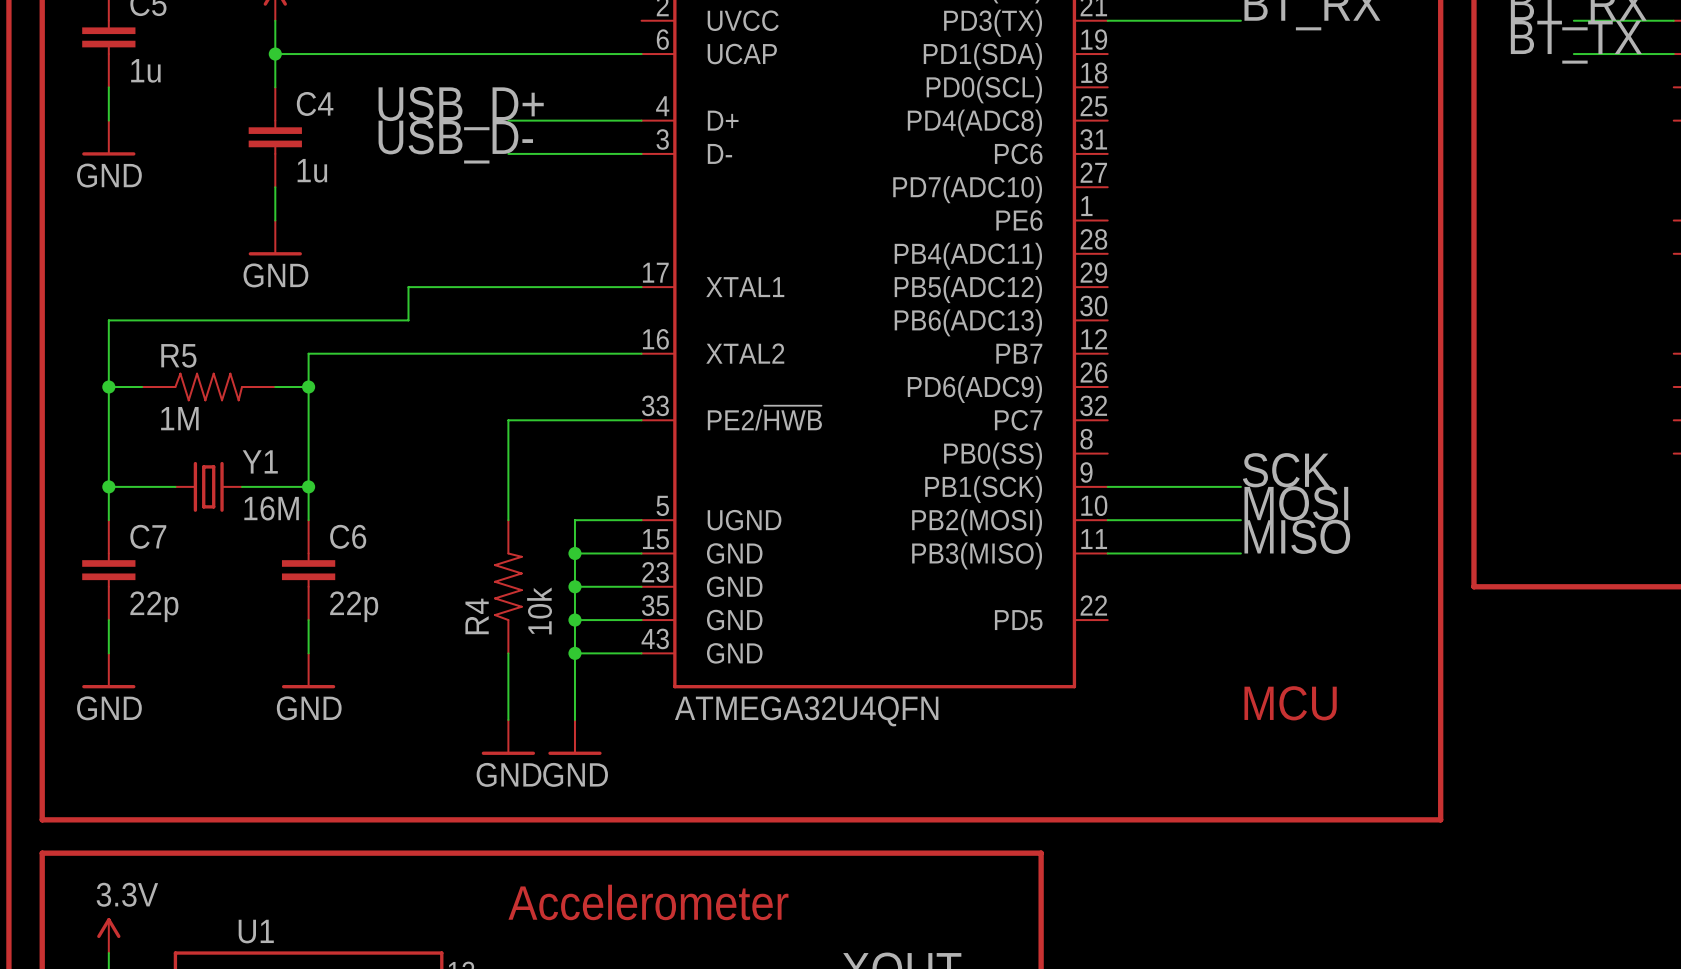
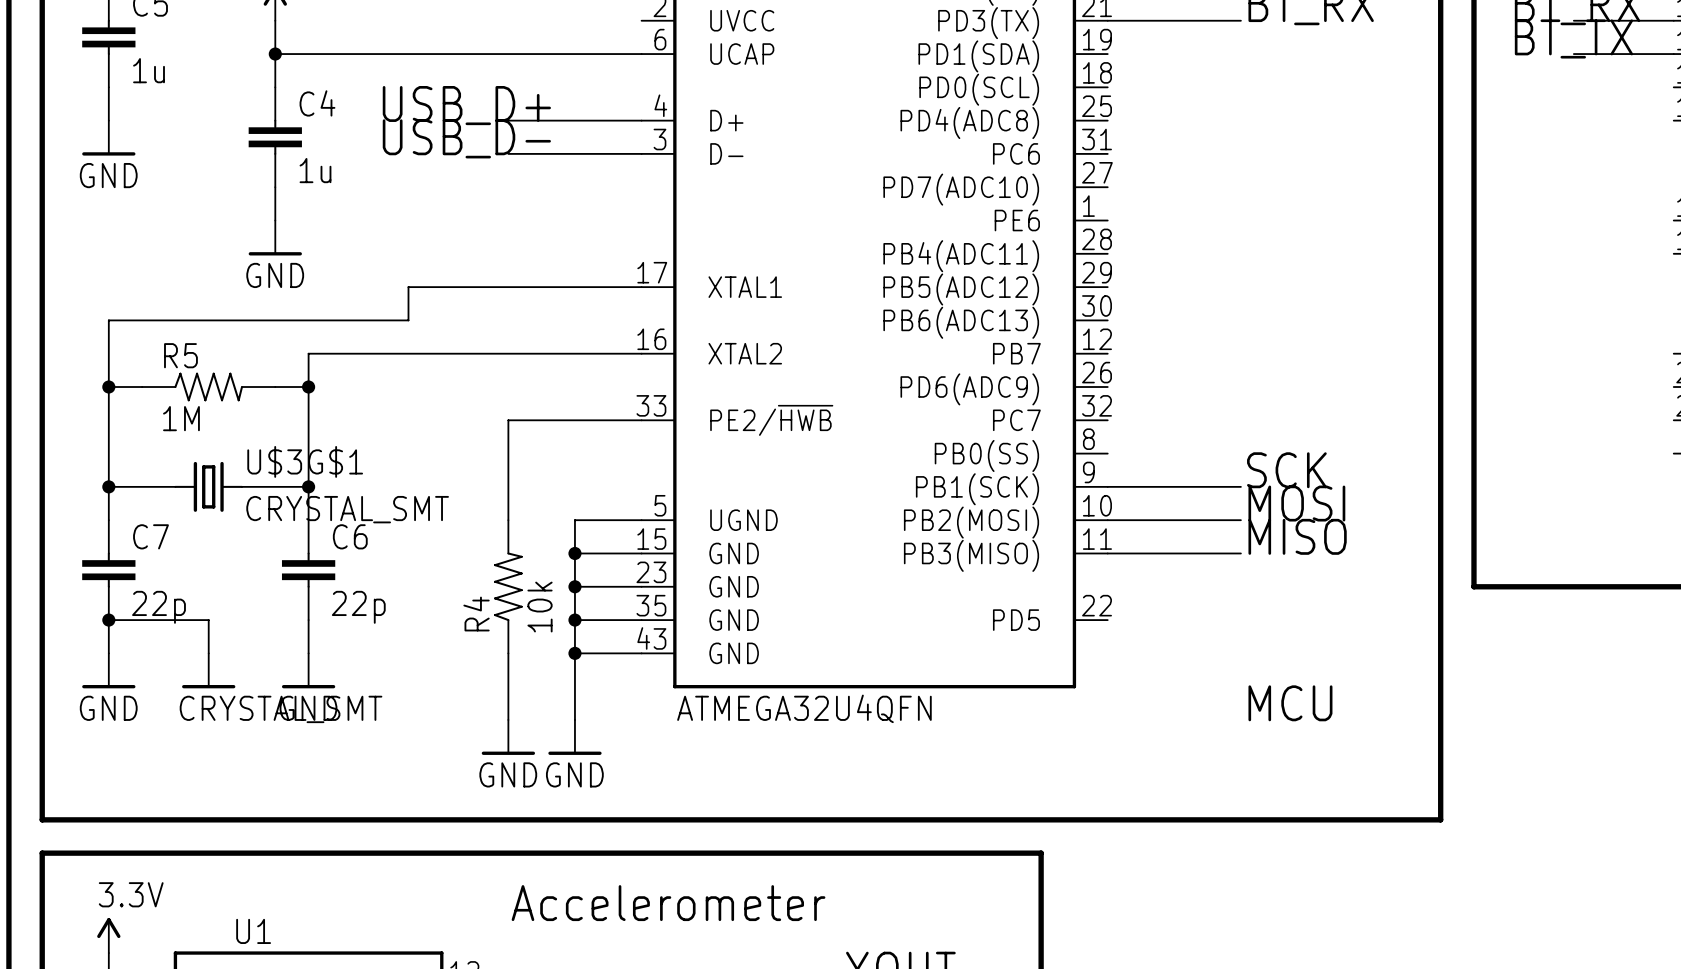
Y1 name: Y1 (260, 461) -> U$3G$1 (305, 461)
Y1 value: 16M (271, 508) -> CRYSTAL_SMT (347, 509)
wire: none -> (108, 620) (208, 620) (208, 653)
junction: none -> (108, 620)
part: none -> CRYSTAL_SMT (208, 670)

